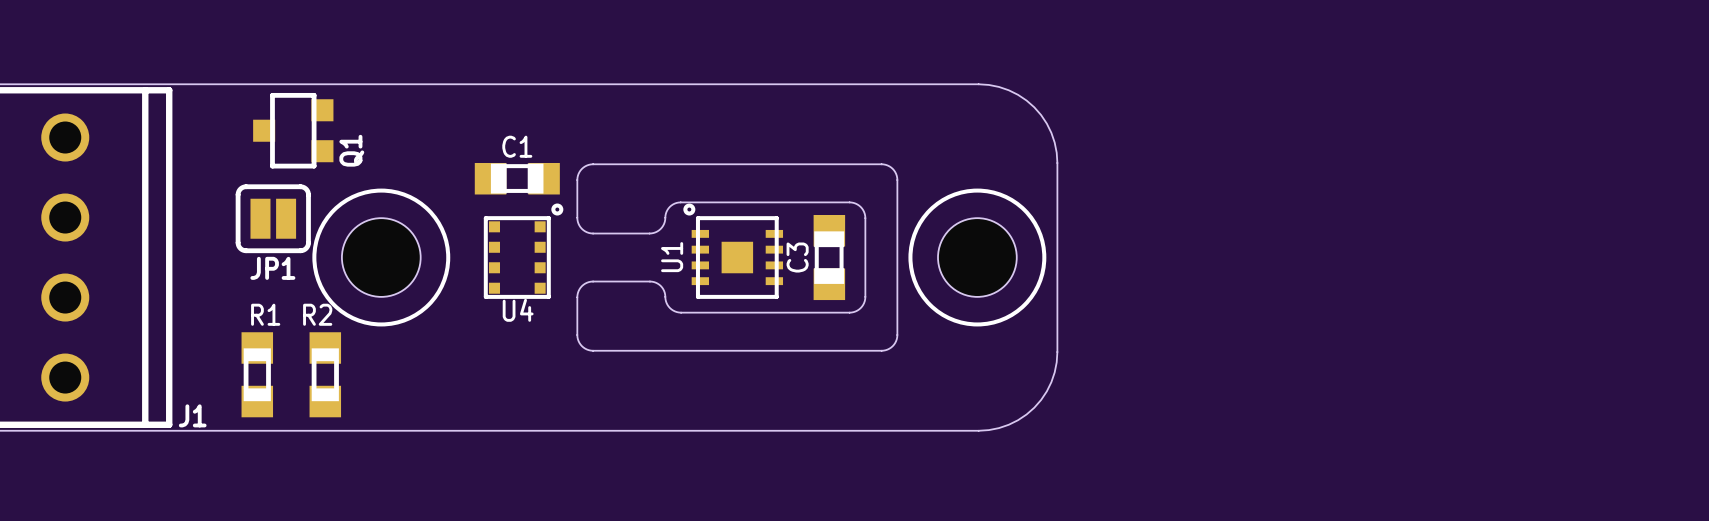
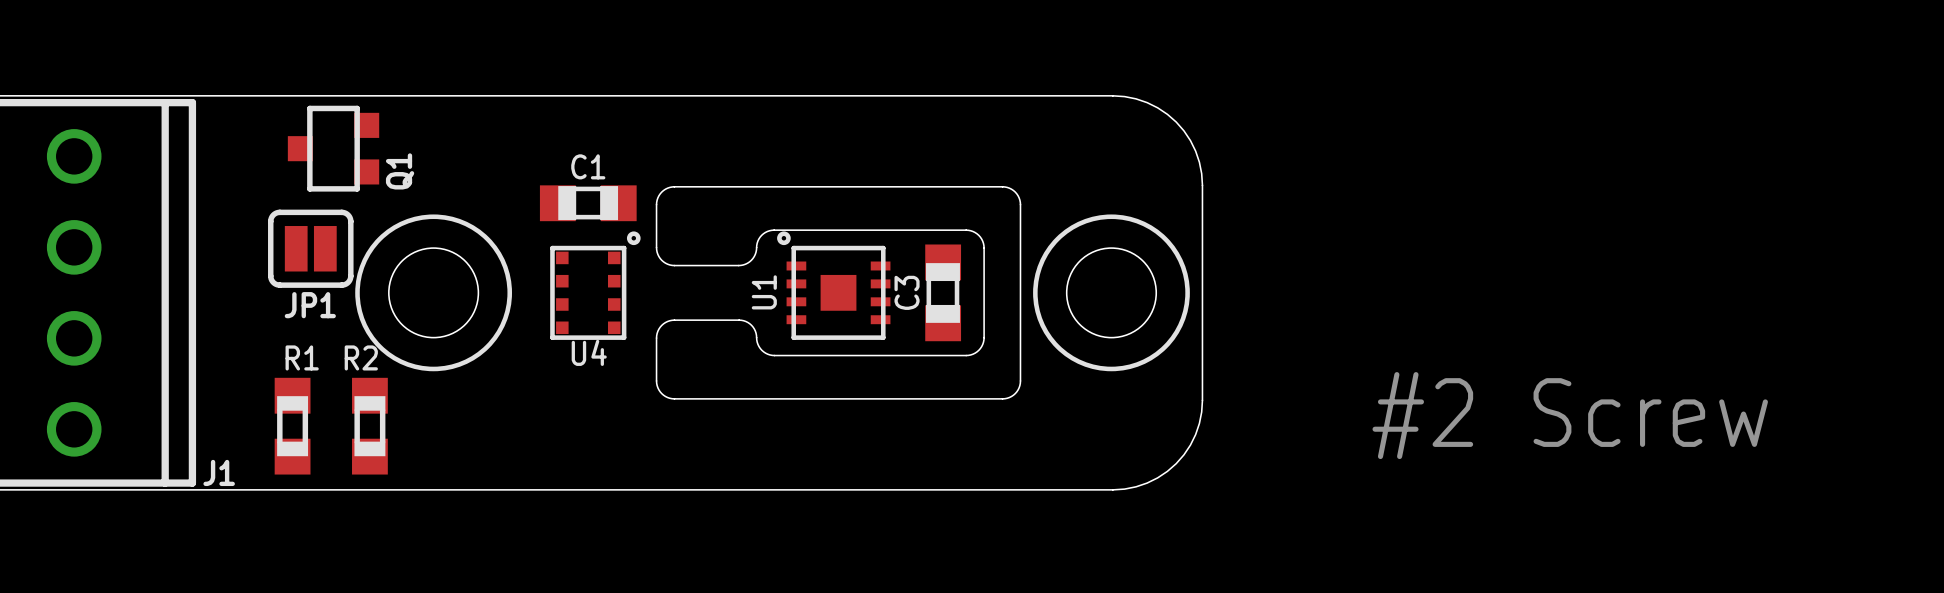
text: none -> #2 Screw (1570, 415)

